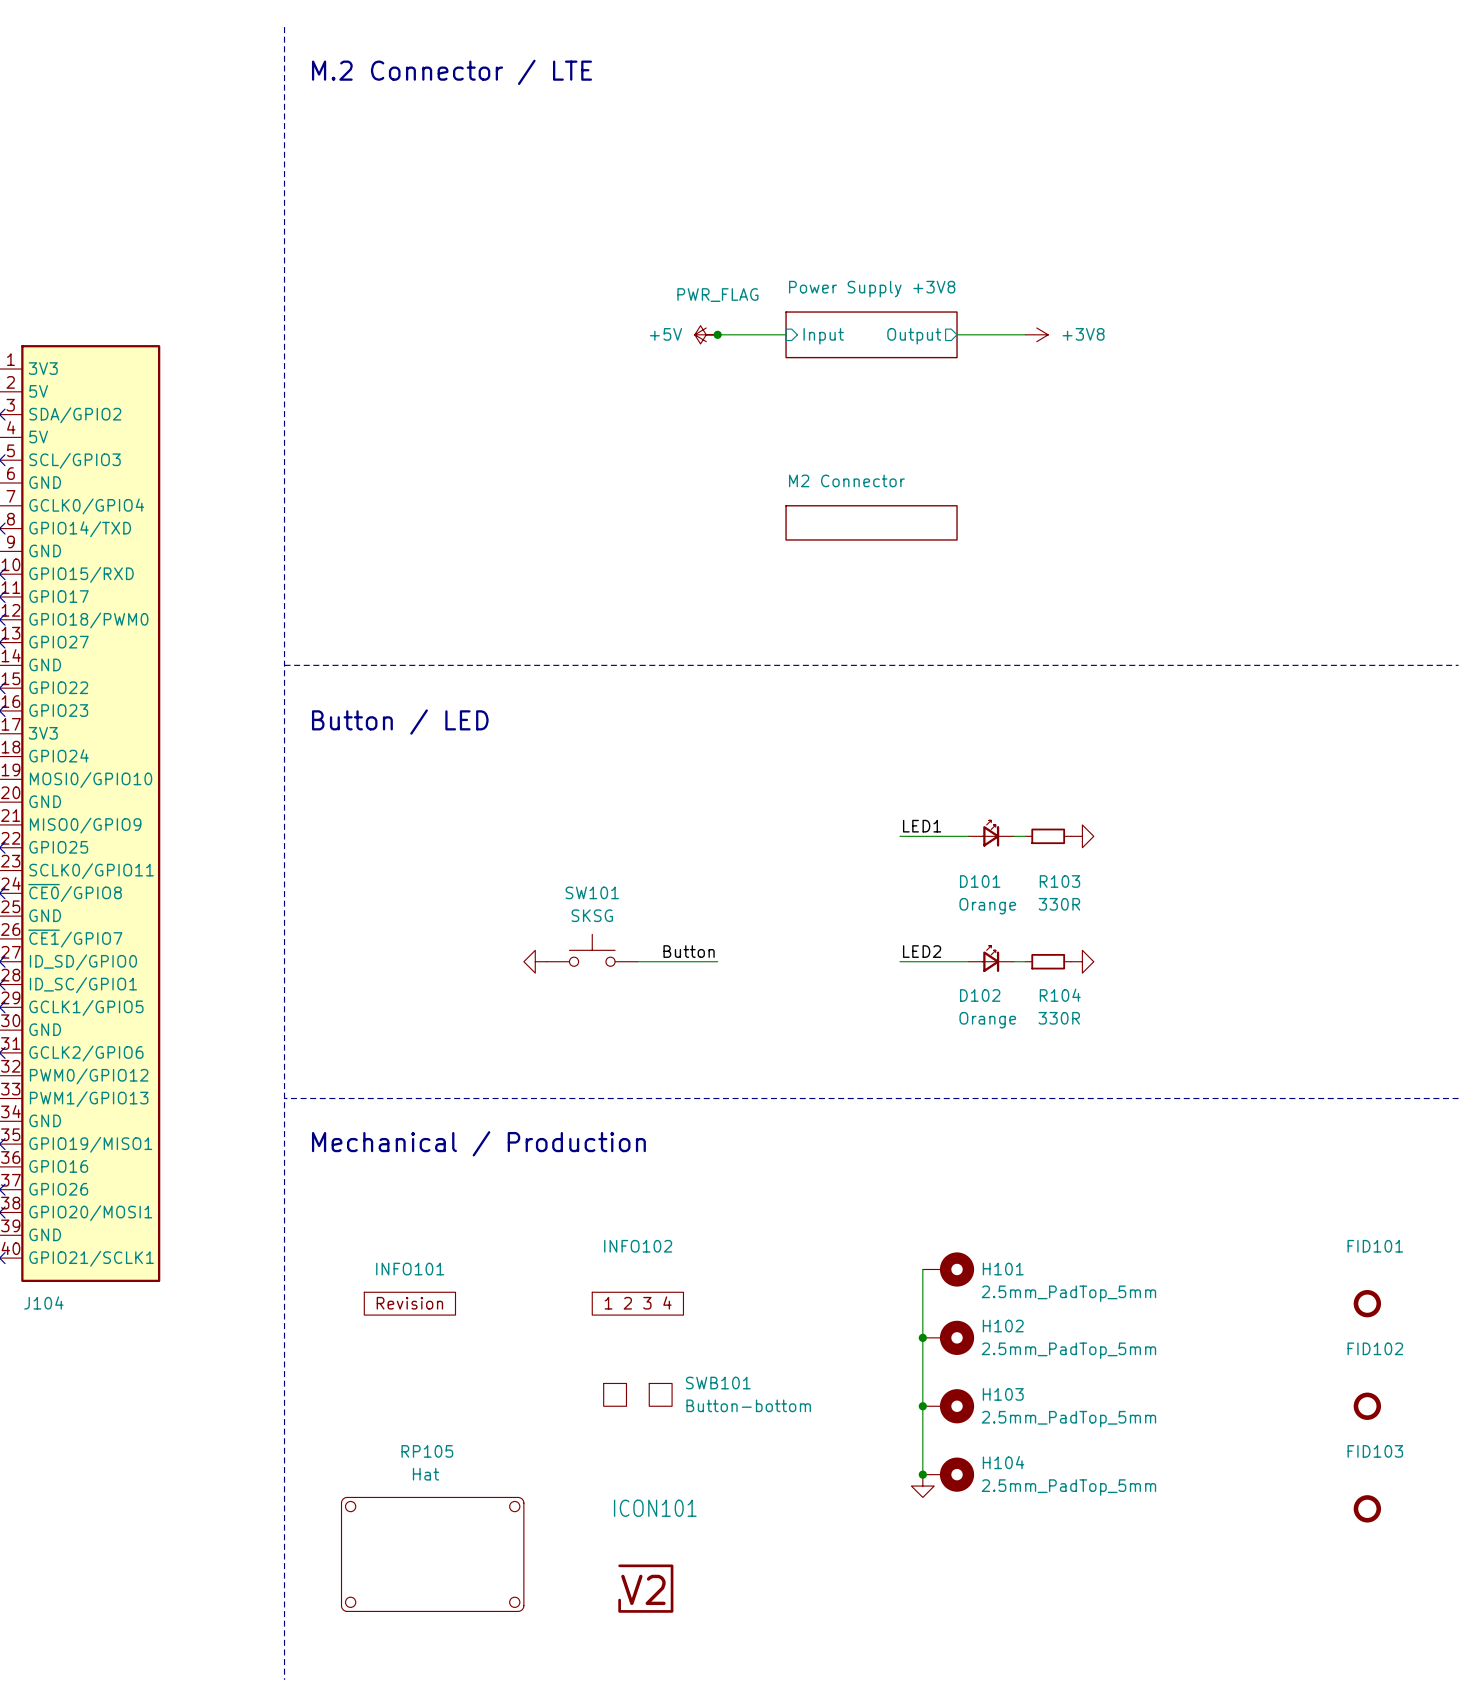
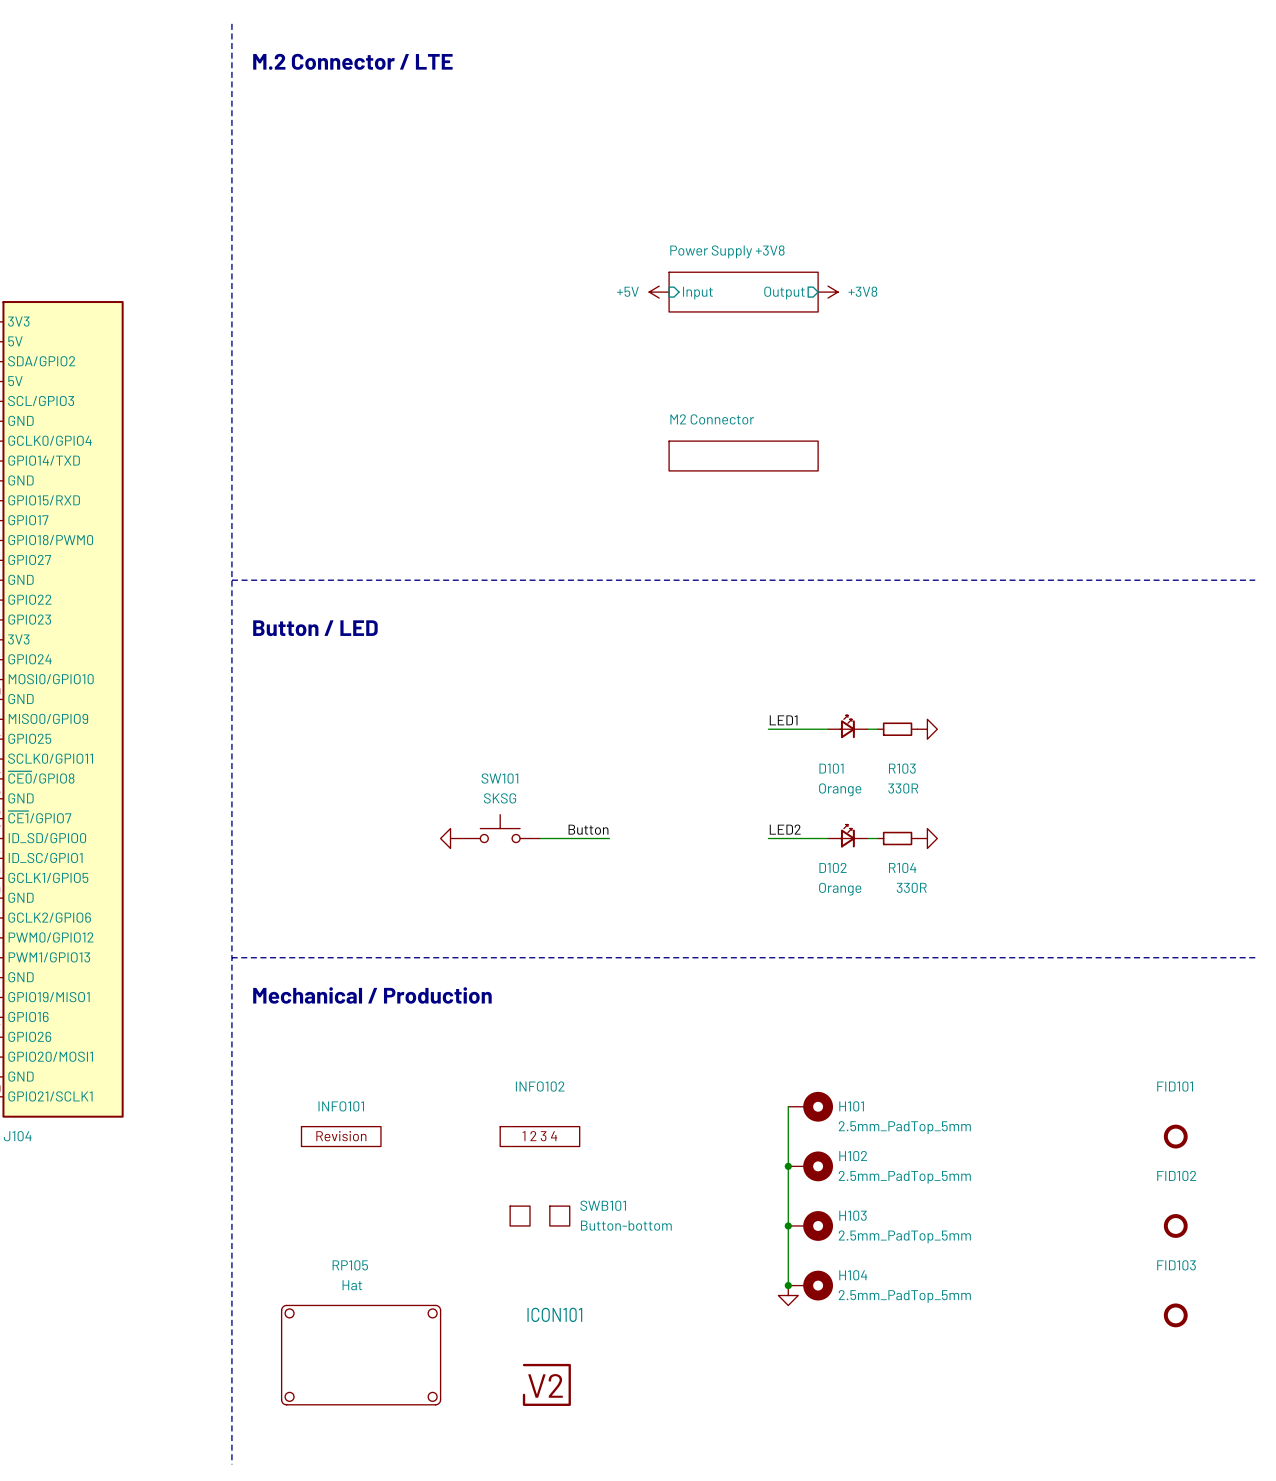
power symbol position: +5V (706, 334) -> +5V (659, 292)
power symbol: PWR_FLAG (706, 334) -> none
wire: (717, 334) (786, 334) -> none
junction: (717, 334) -> none
wire: (957, 334) (1025, 334) -> none
power symbol position: +3V8 (1036, 334) -> +3V8 (828, 292)

